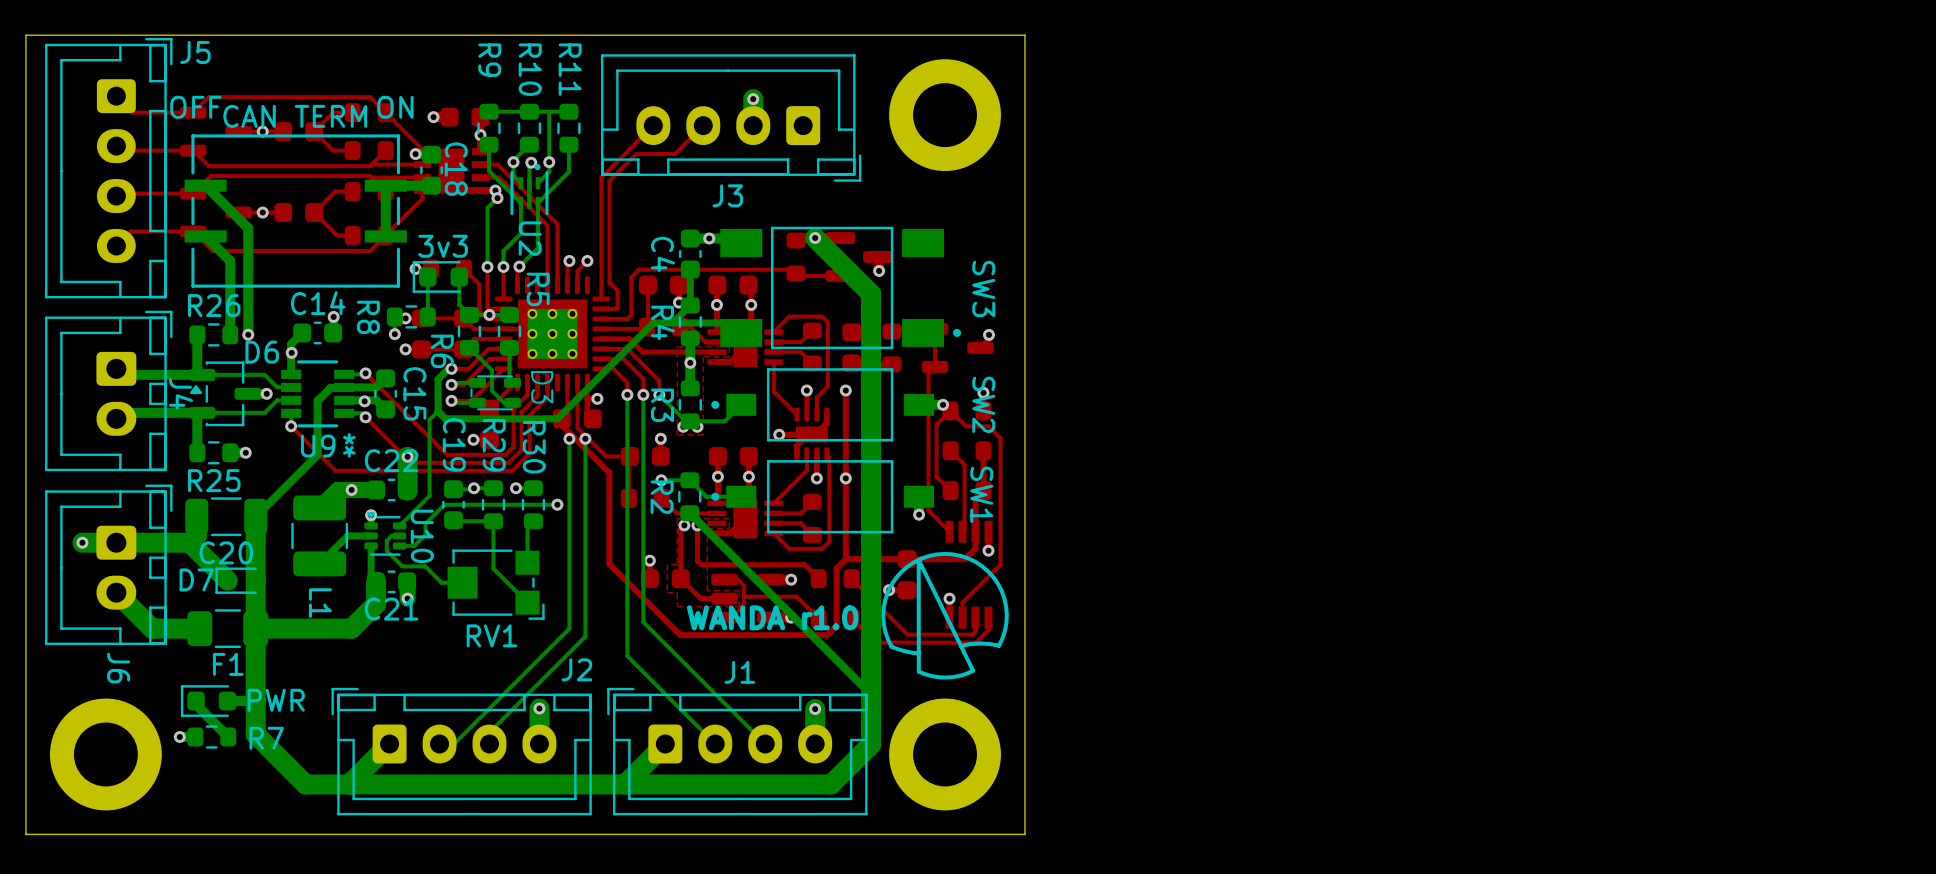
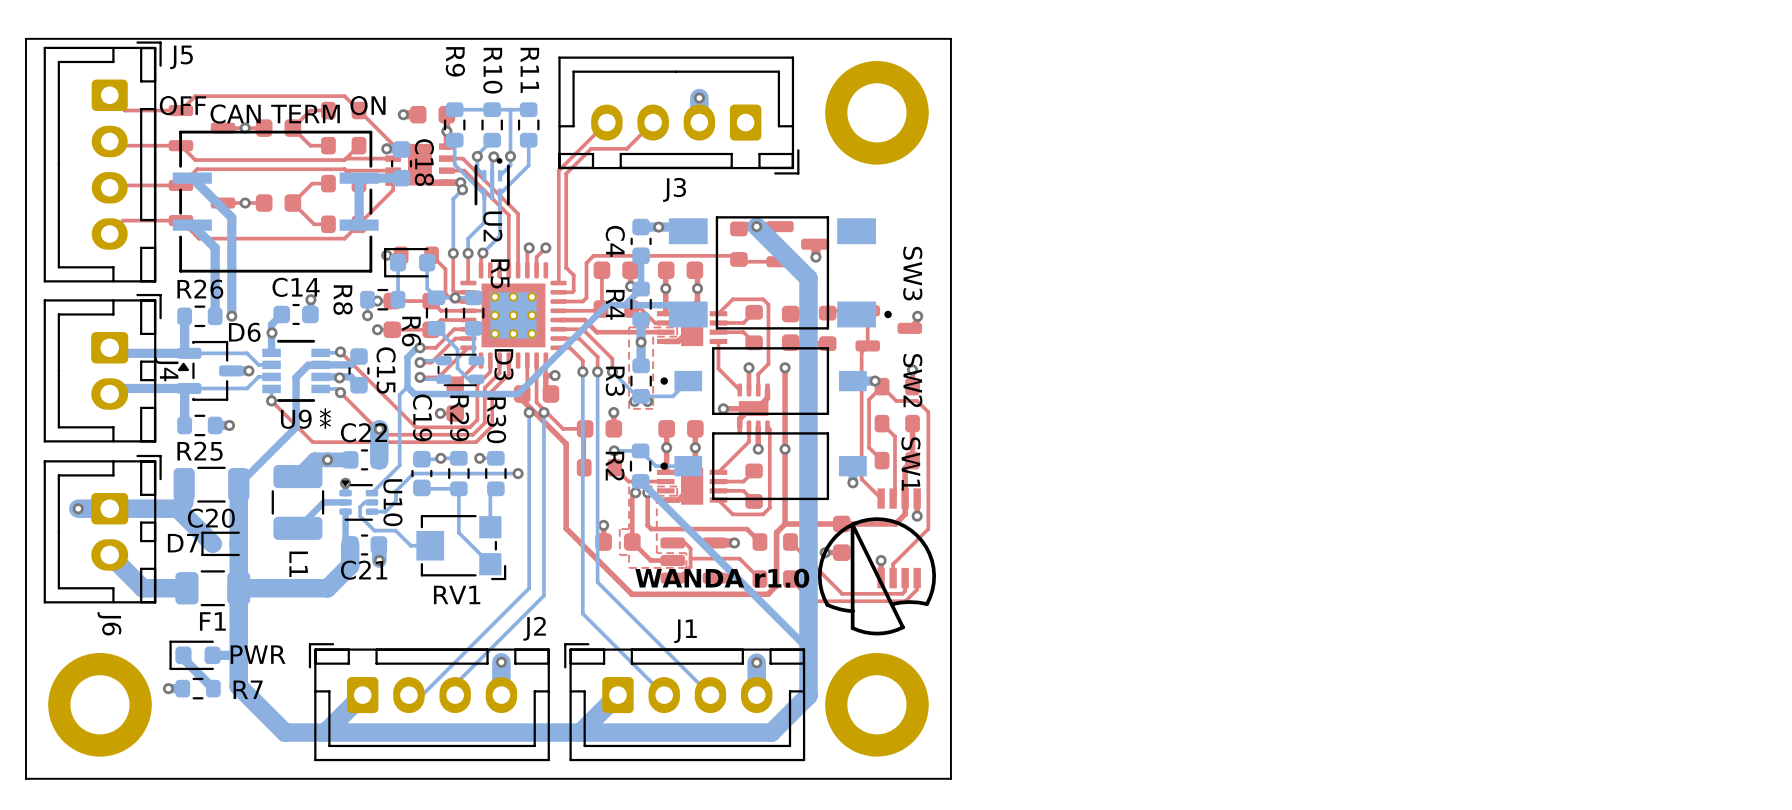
part value: 3v3 (443, 246) -> none

